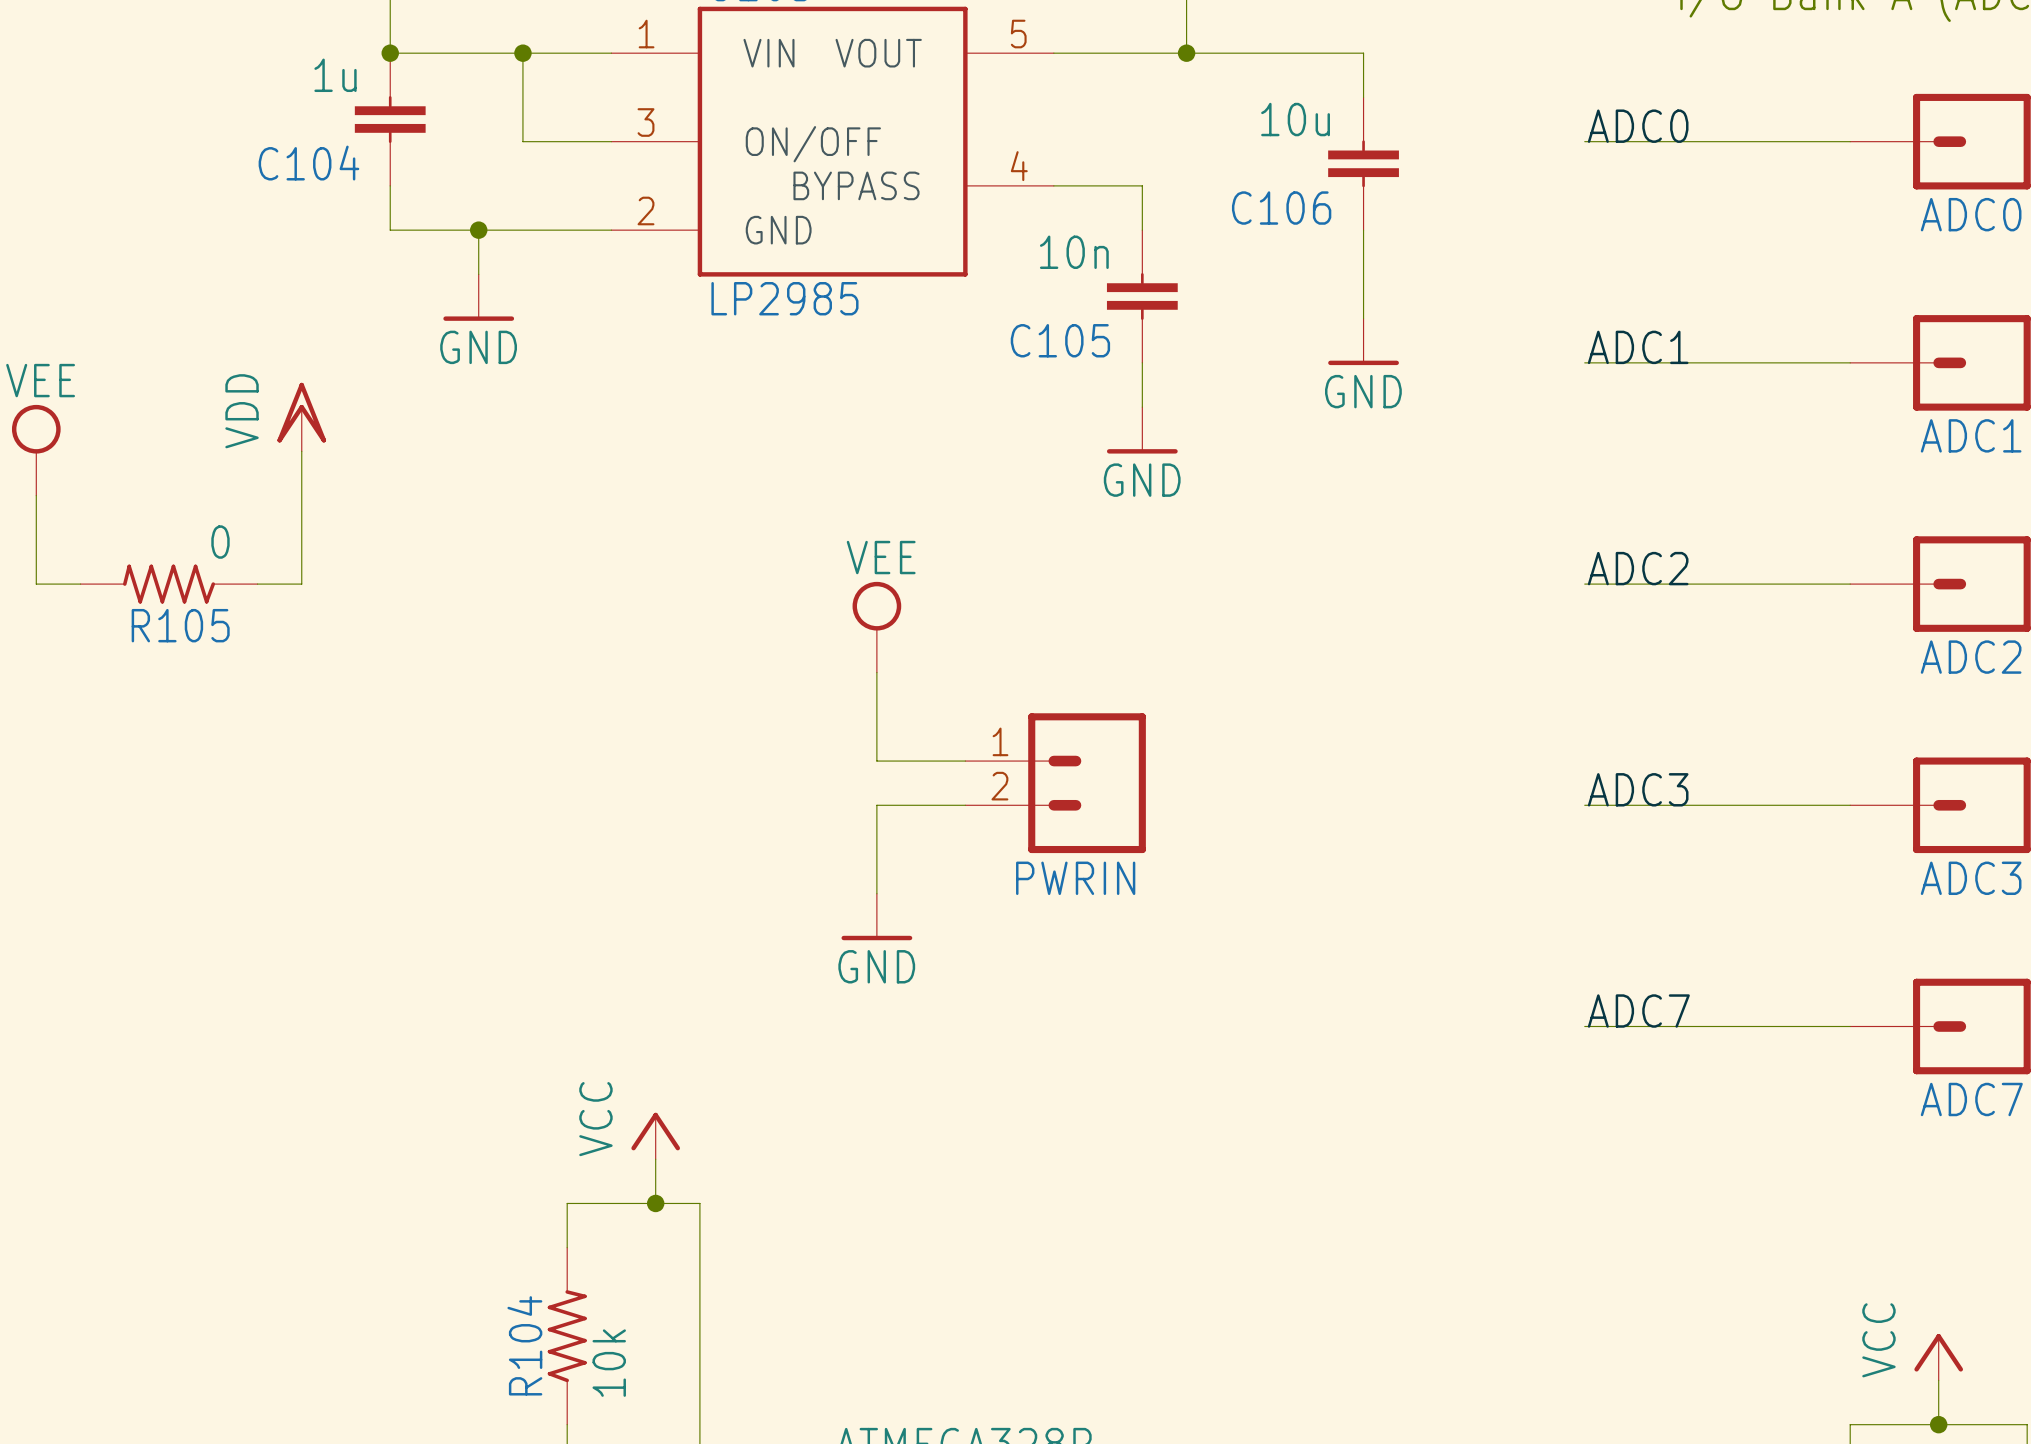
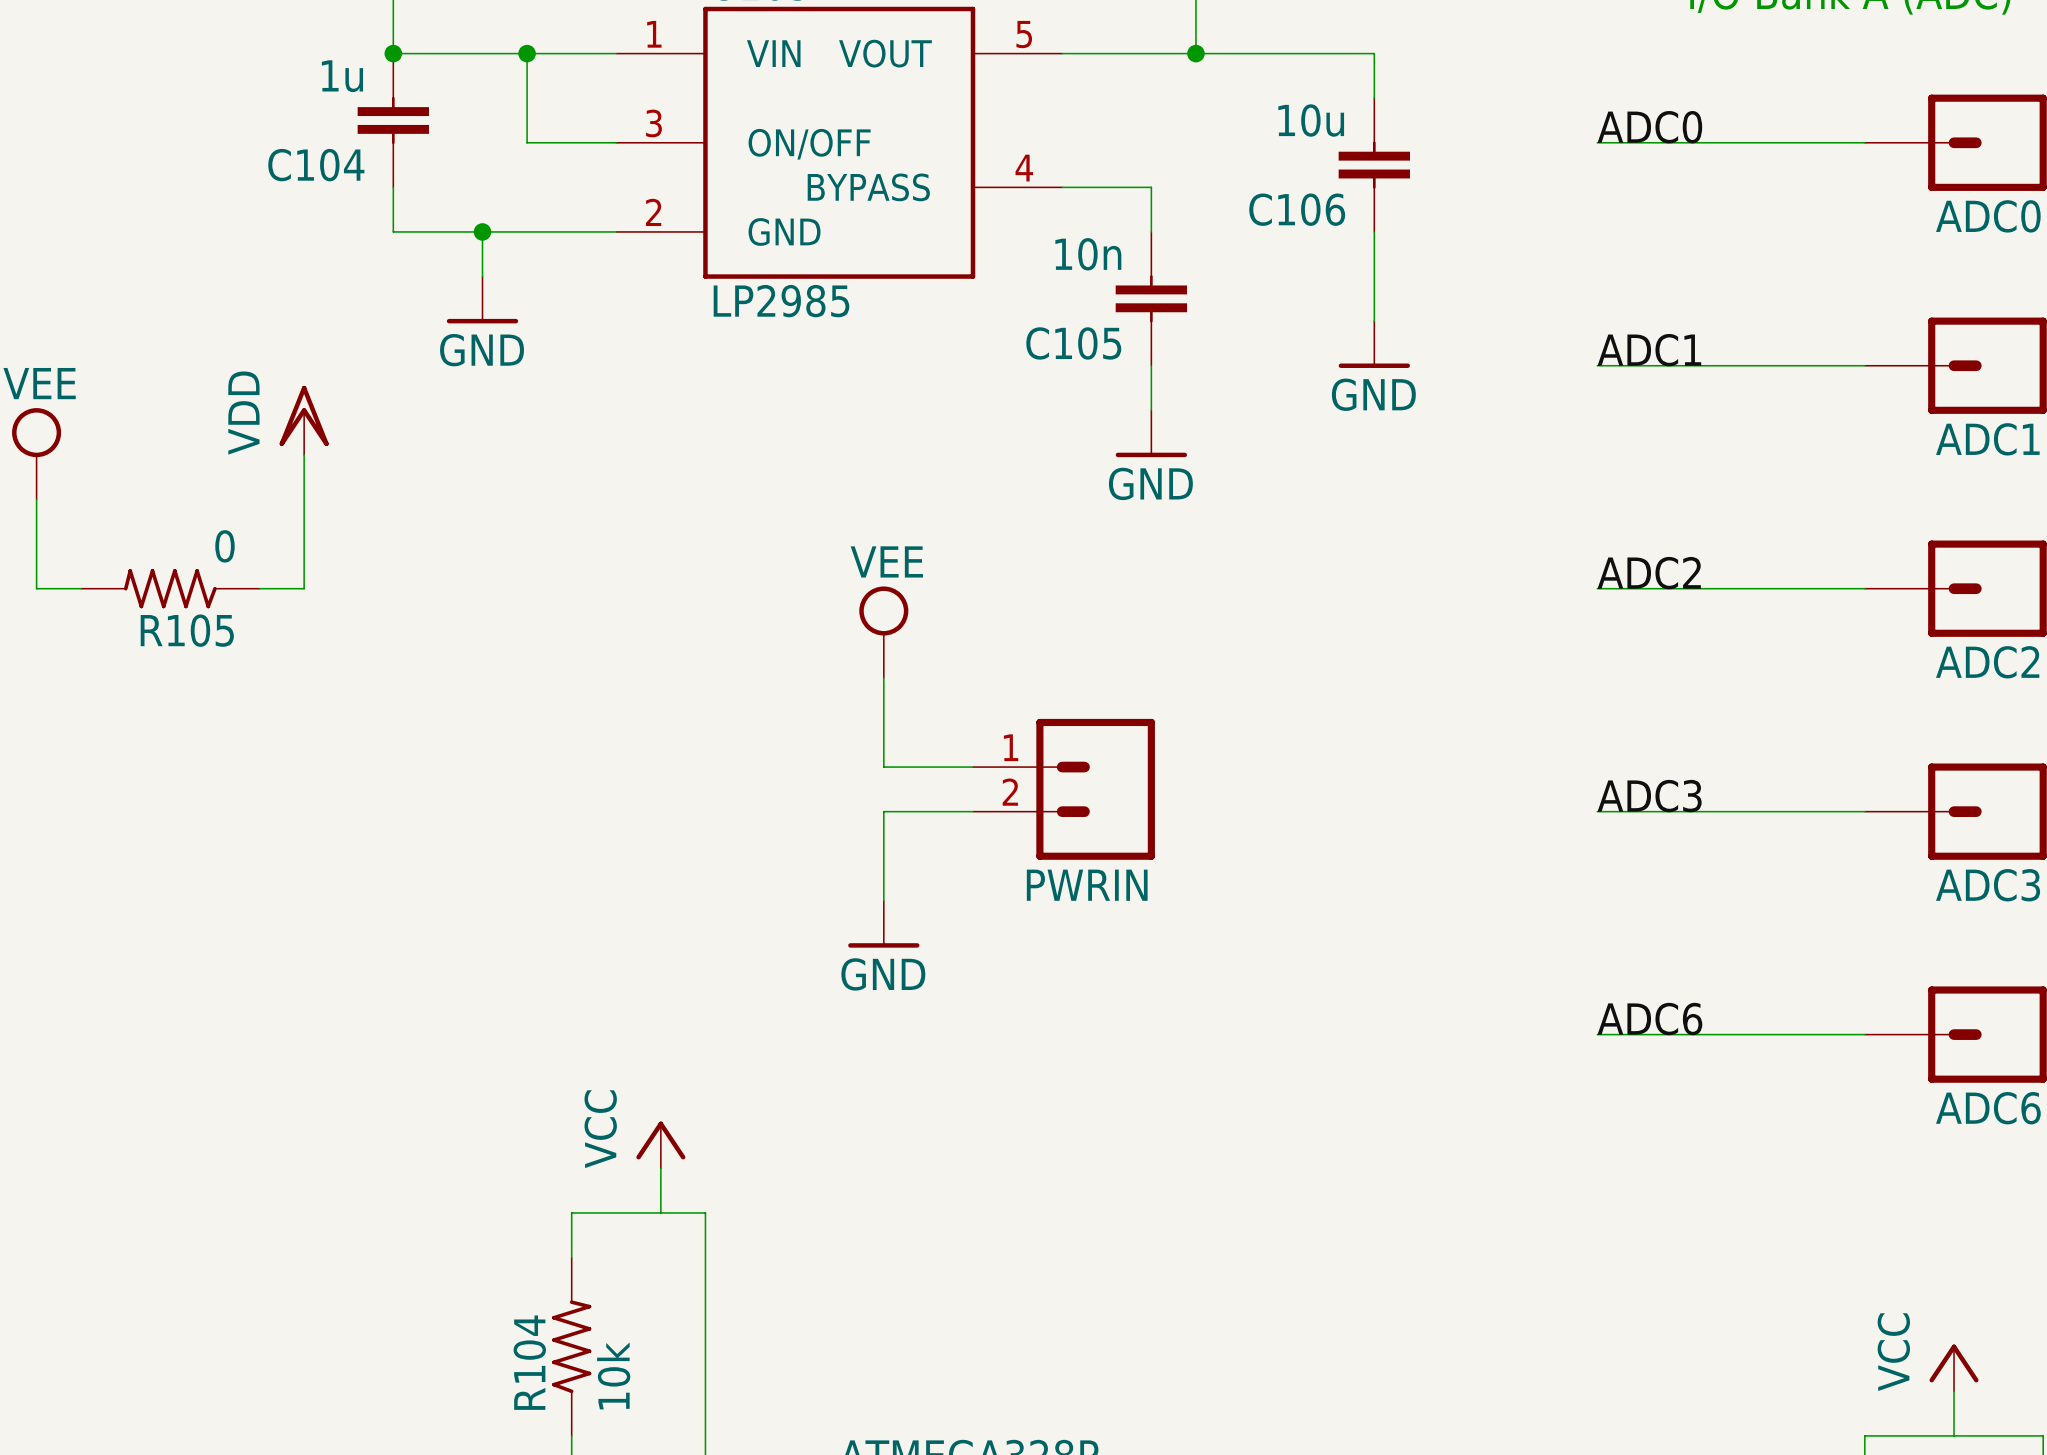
label: ADC7 (1638, 1011) -> ADC6 (1649, 1019)
ADC7 name: ADC7 (1971, 1099) -> ADC6 (1988, 1108)
junction: (655, 1203) -> none
junction: (1938, 1424) -> none

